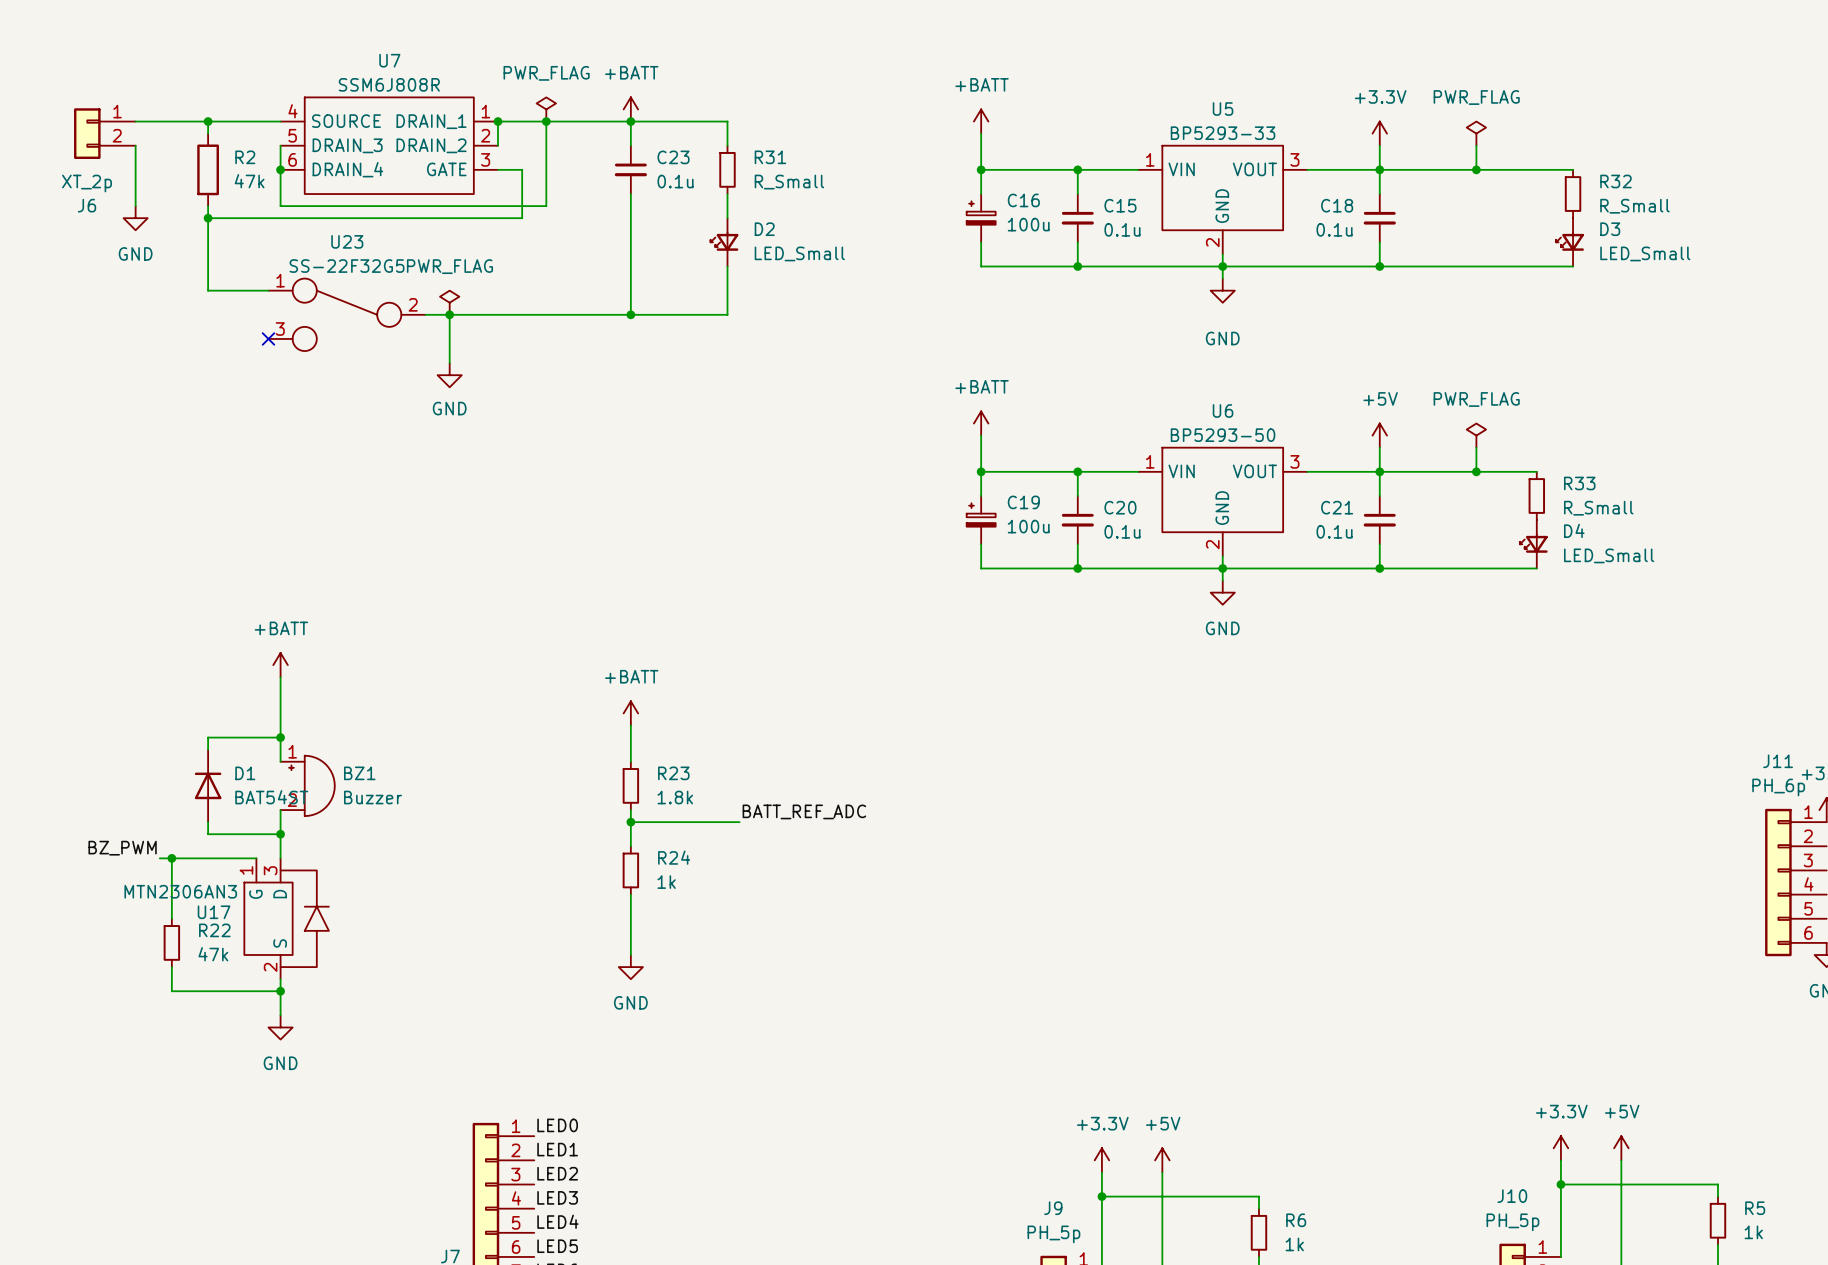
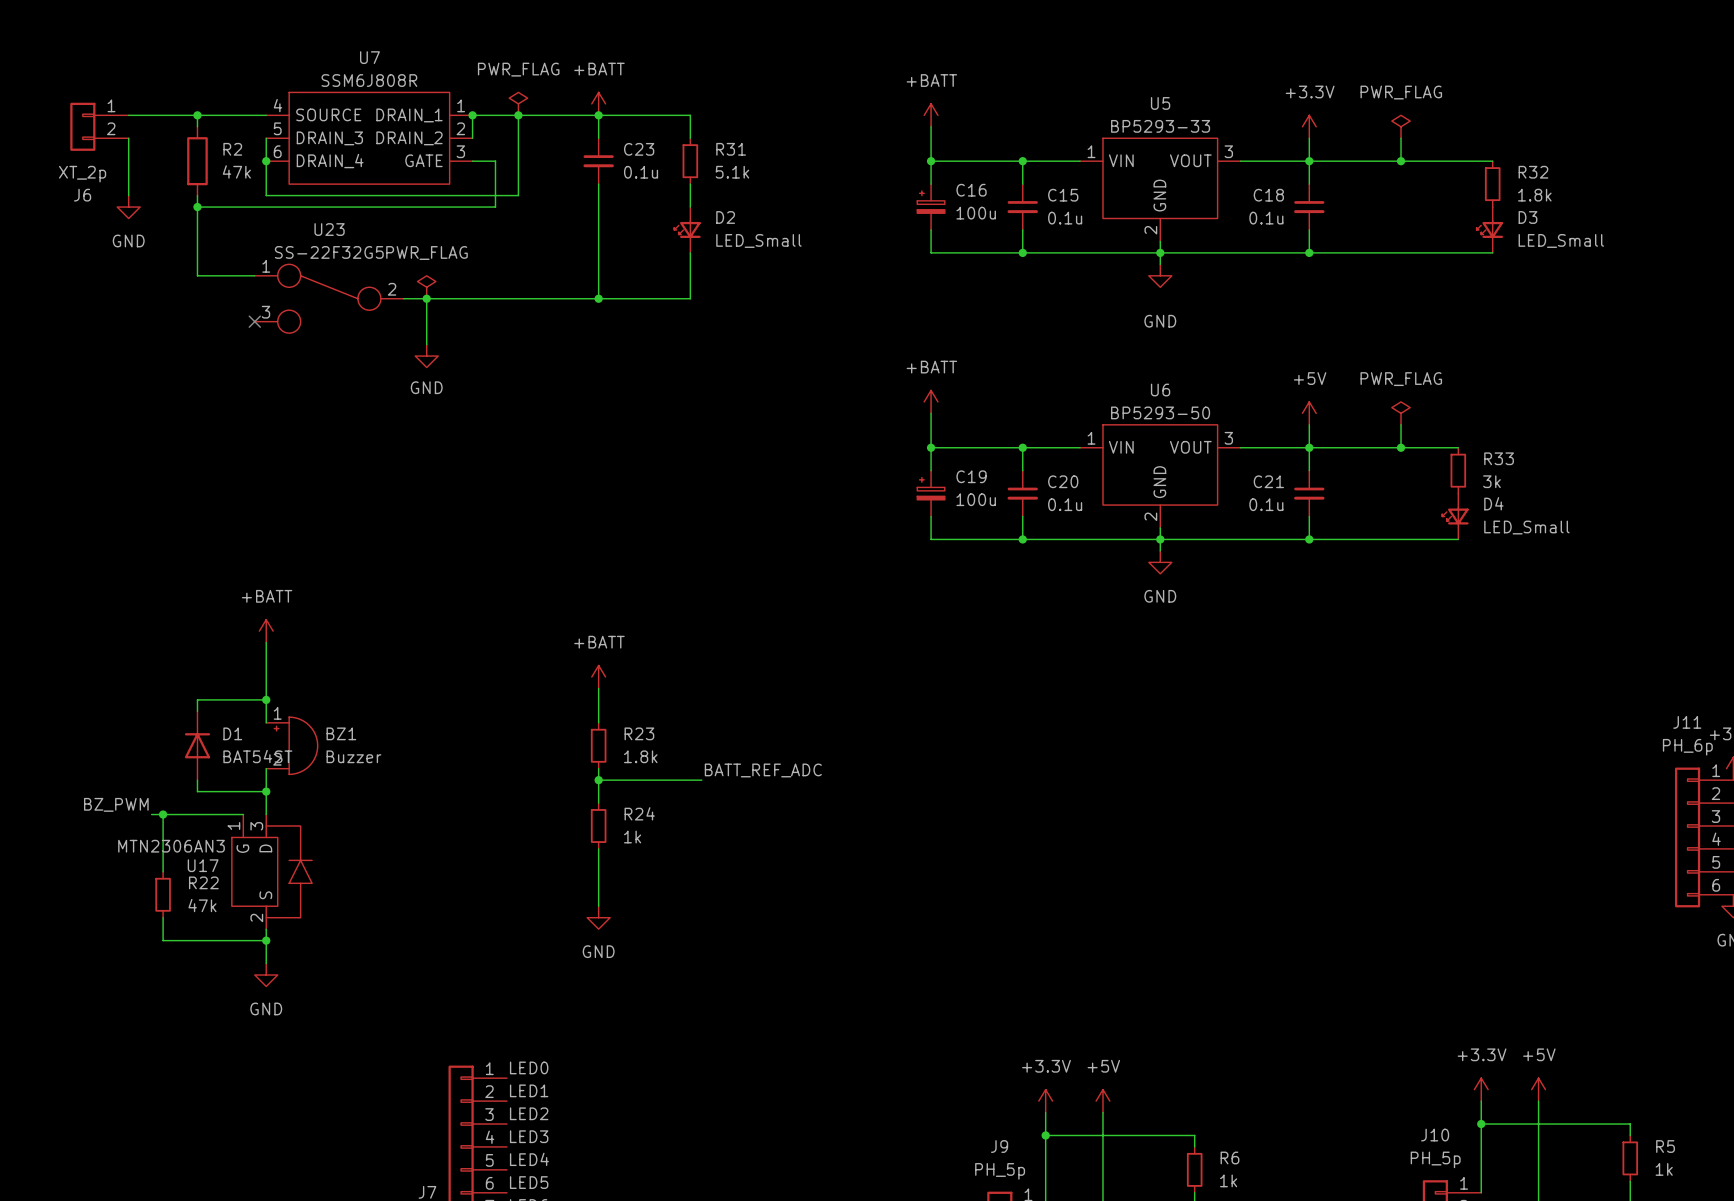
R31 value: R_Small (789, 182) -> 5.1k (732, 172)
R32 value: R_Small (1634, 206) -> 1.8k (1534, 195)
R33 value: R_Small (1598, 508) -> 3k (1491, 481)

